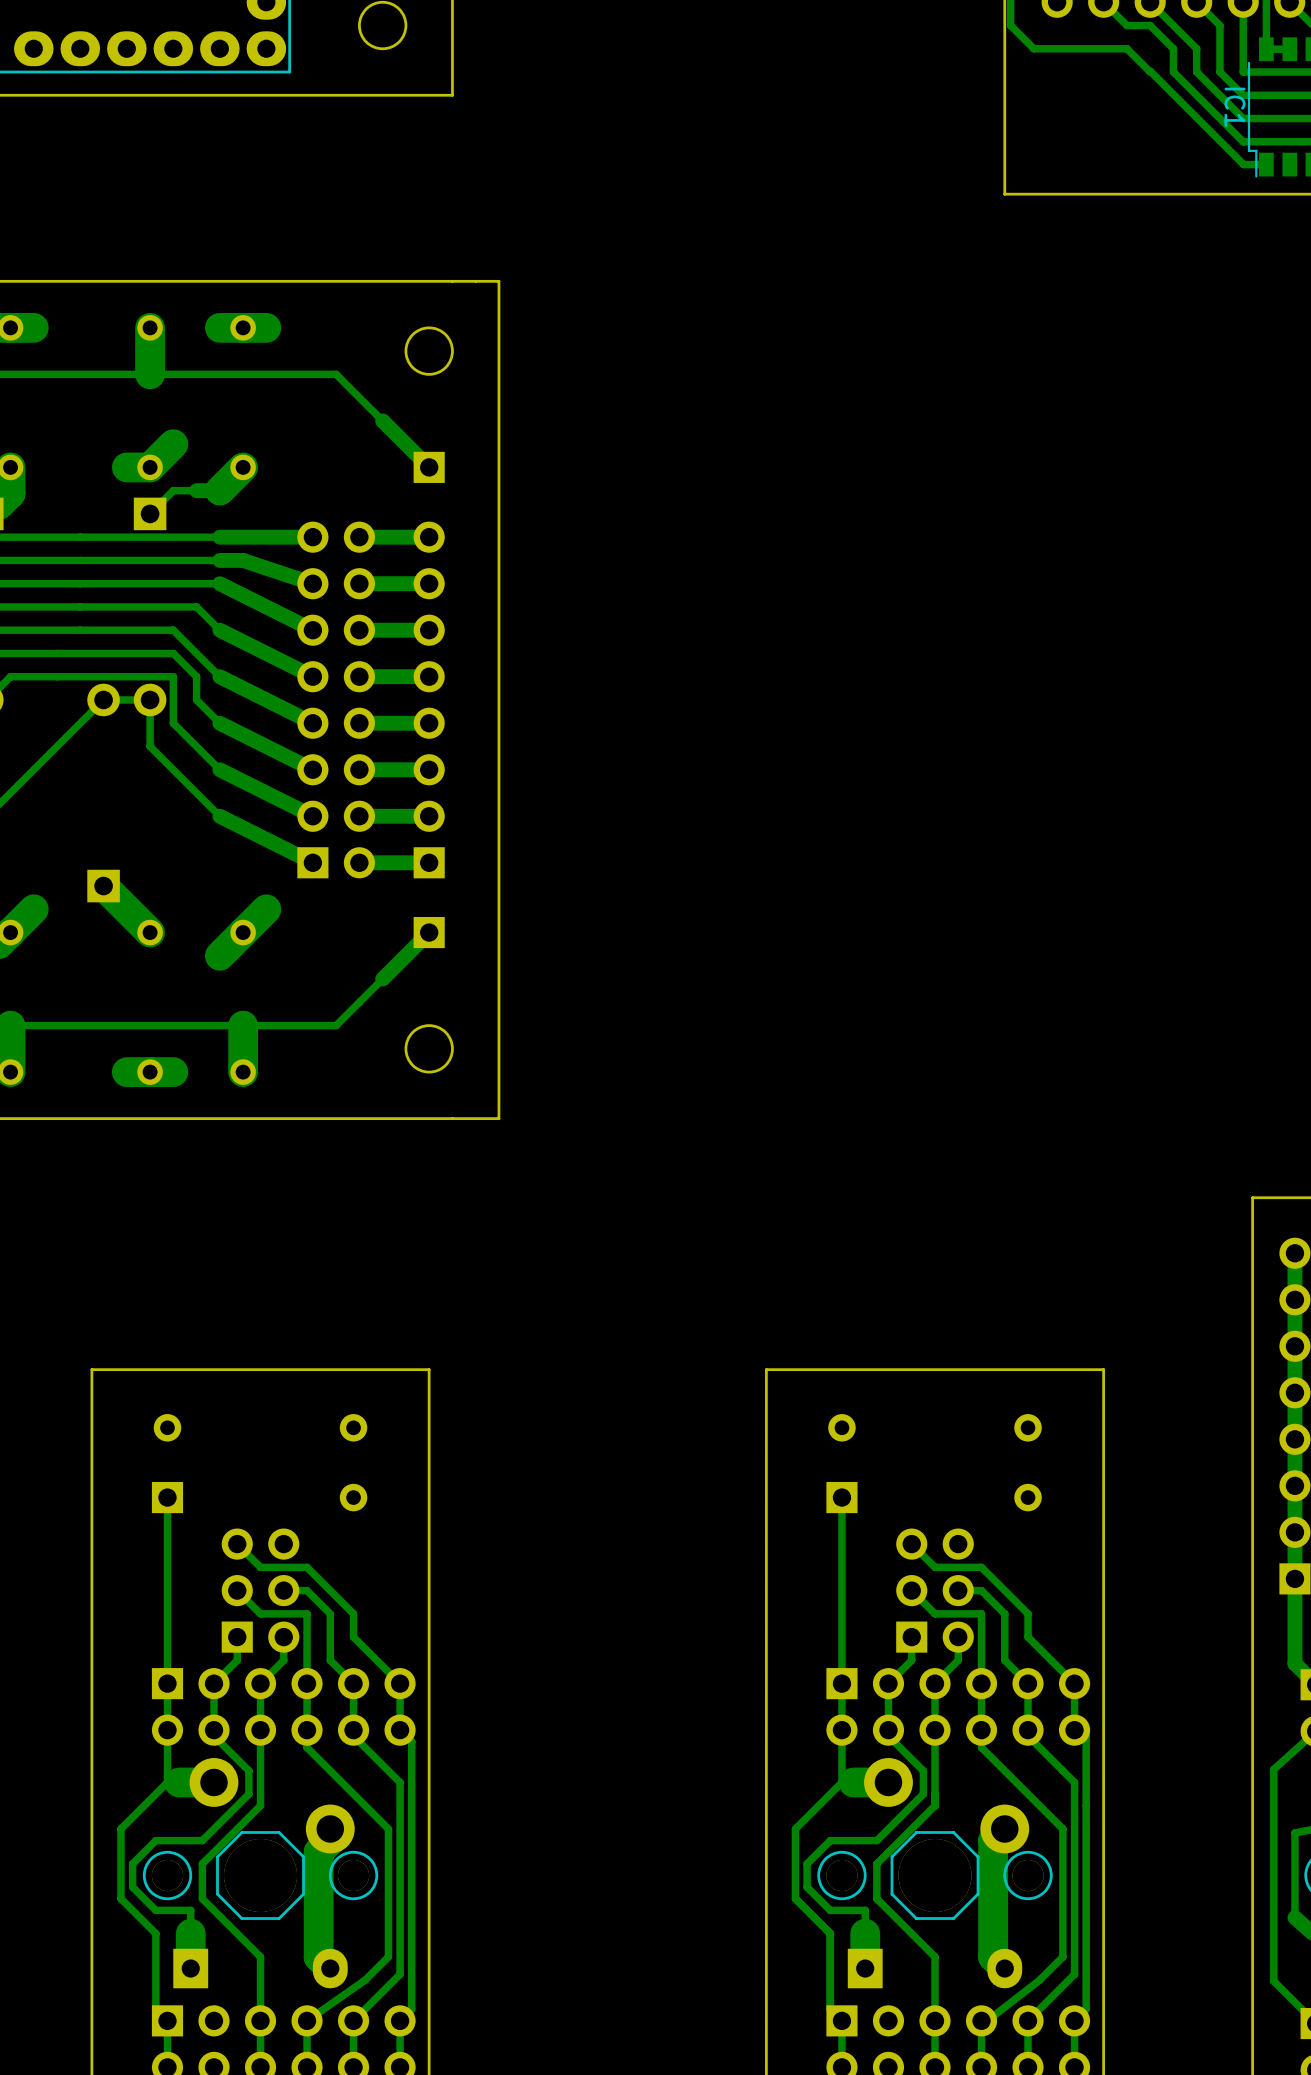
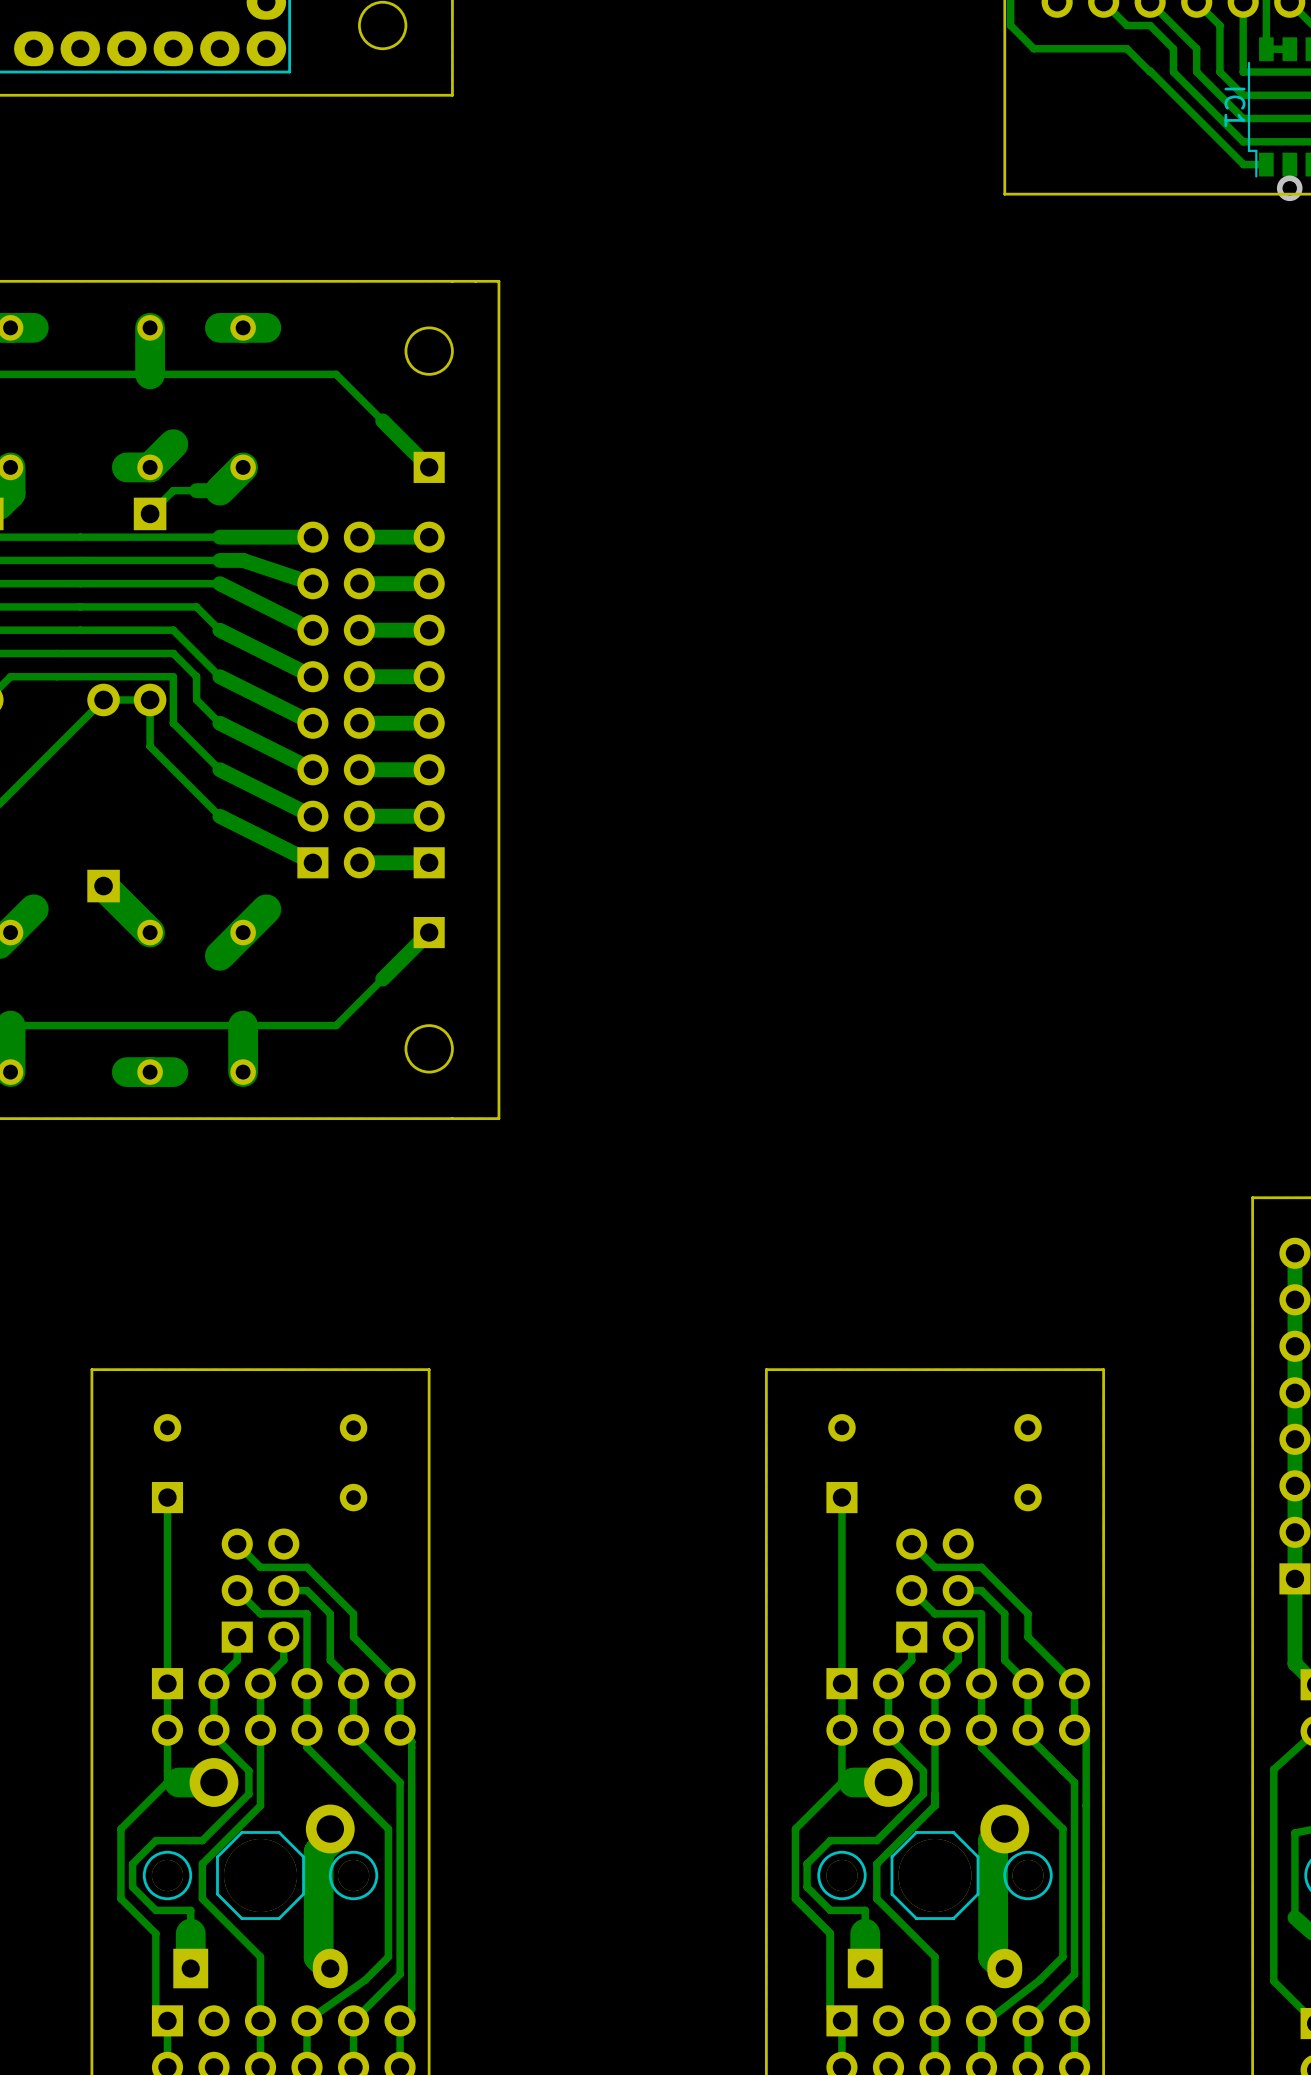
via: none -> (1289, 188)

